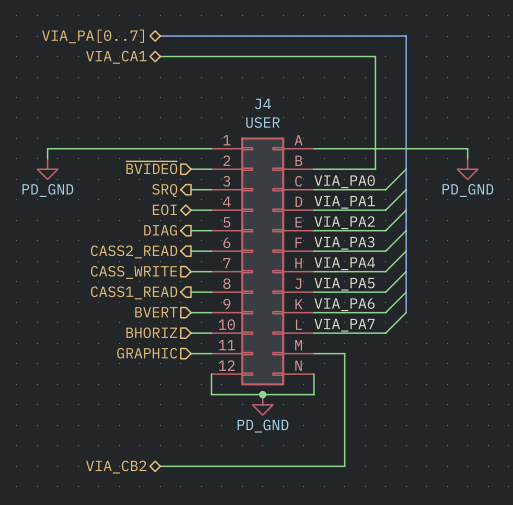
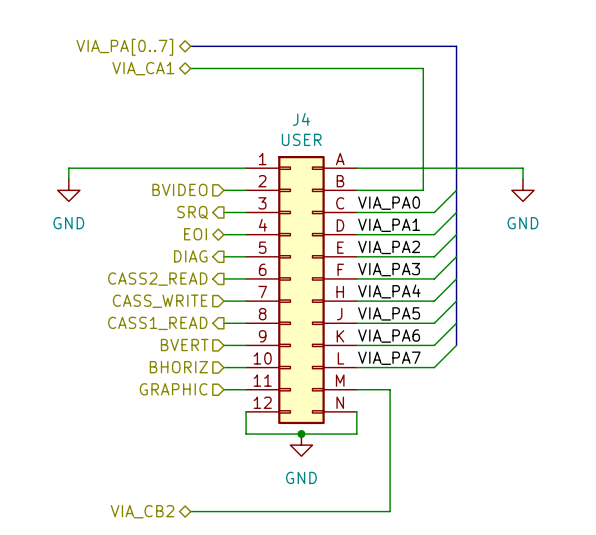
hierarchical label: ~{BVIDEO} (151, 167) -> BVIDEO (179, 189)
power symbol: PD_GND (47, 169) -> GND (68, 190)
power symbol: PD_GND (467, 169) -> GND (522, 190)
power symbol: PD_GND (262, 404) -> GND (301, 445)

